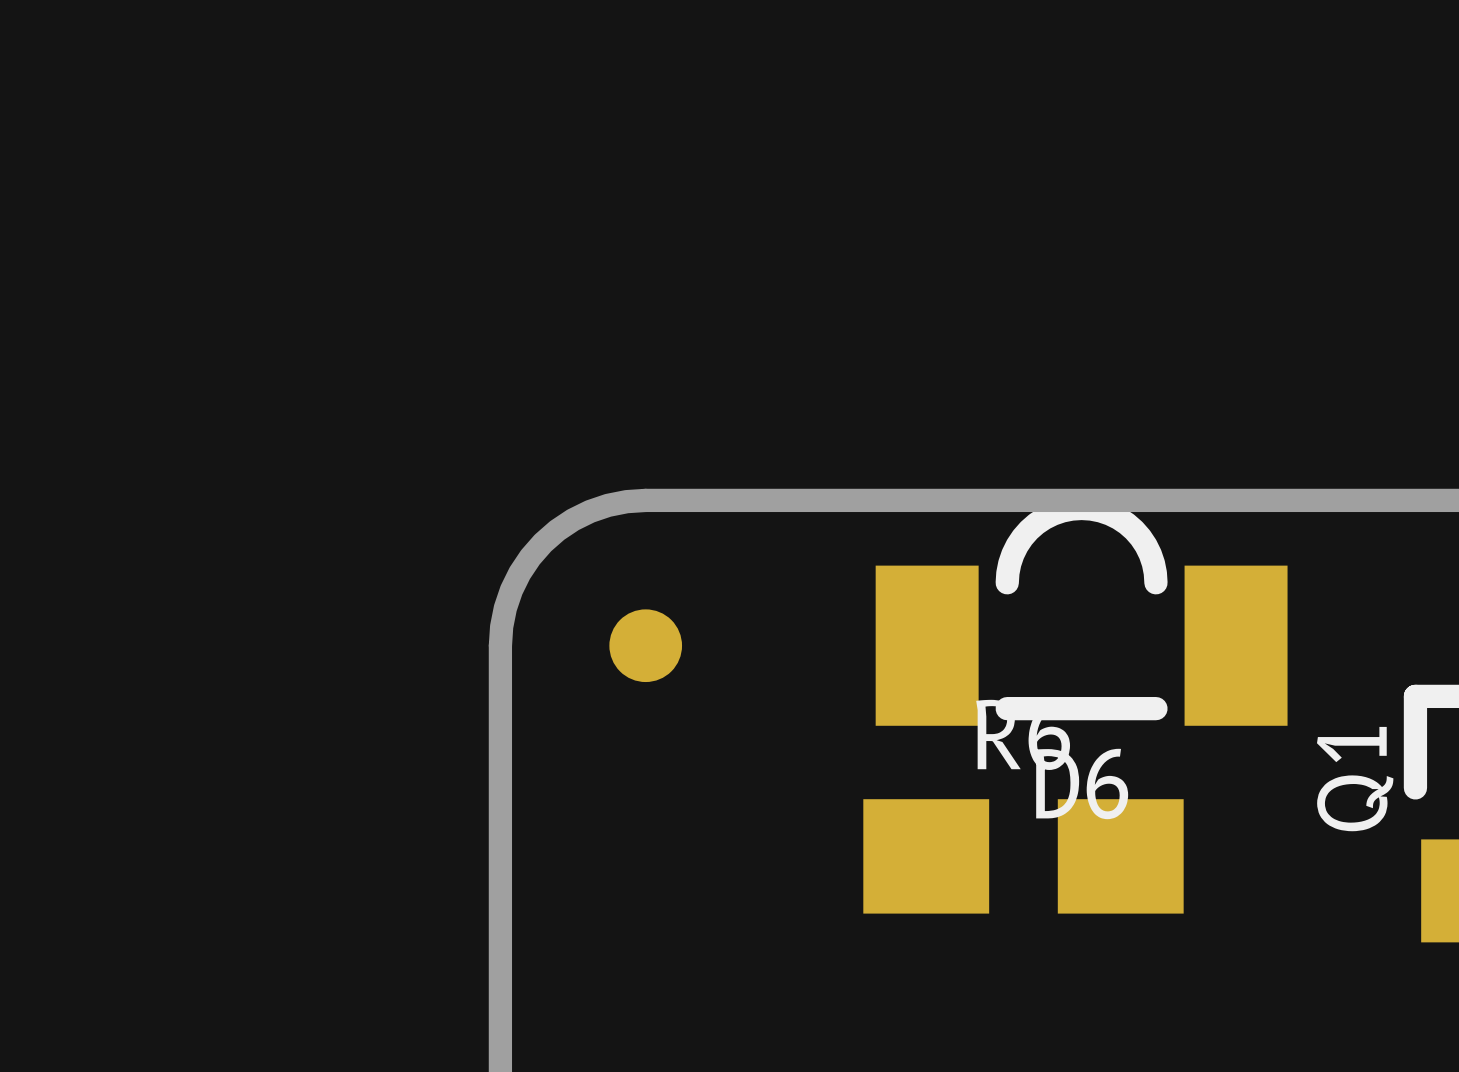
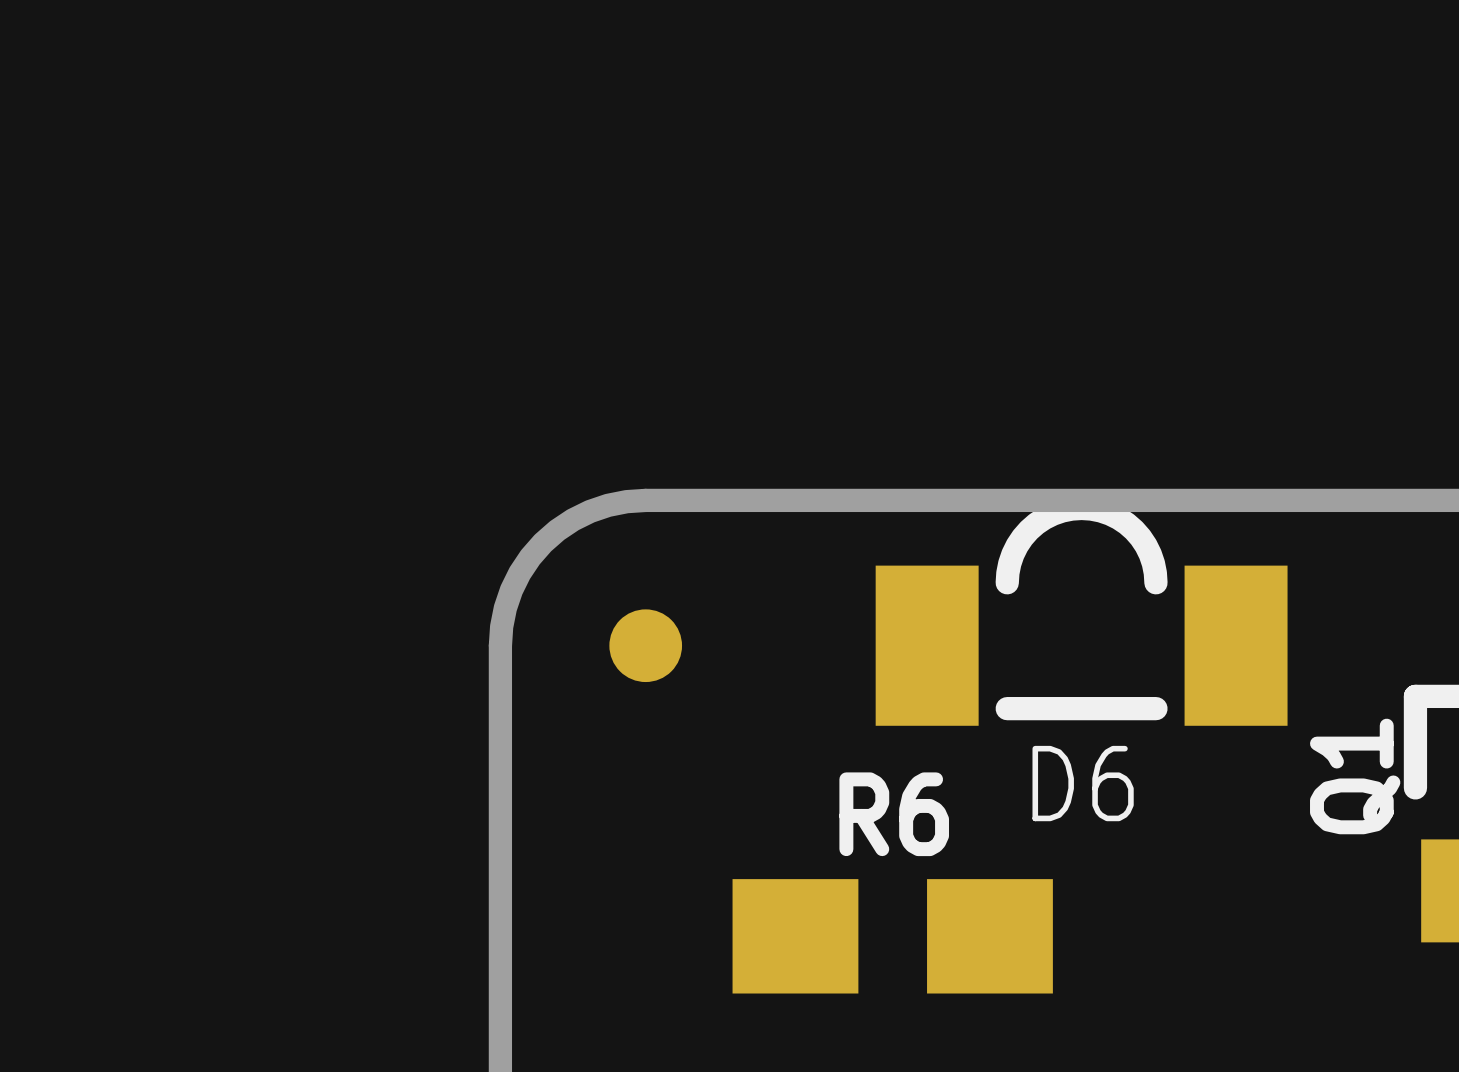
R6 position: (1023, 856) -> (892, 936)

